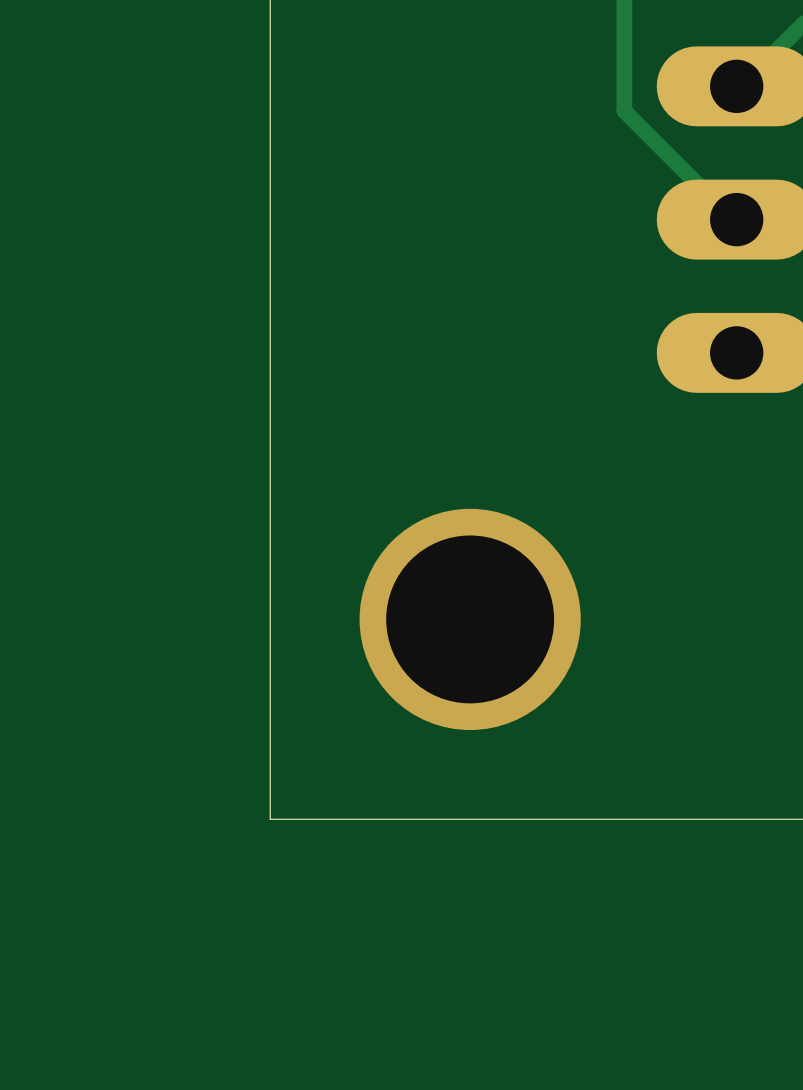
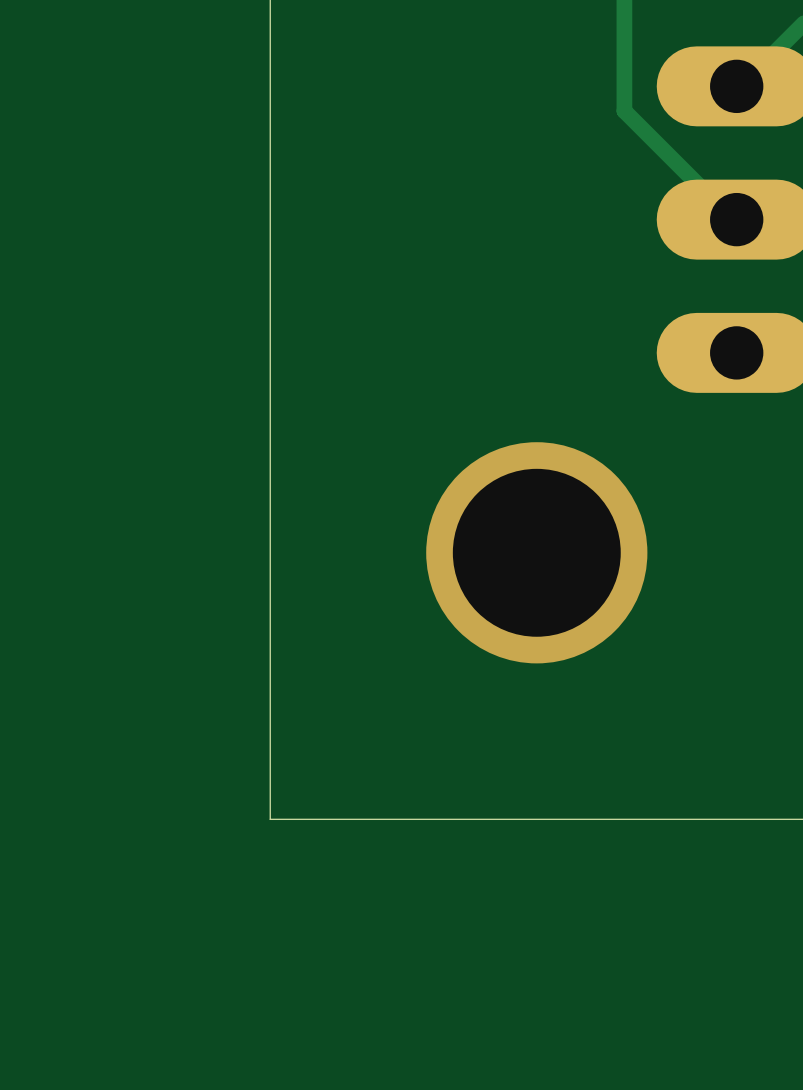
via position: (470, 619) -> (536, 552)

